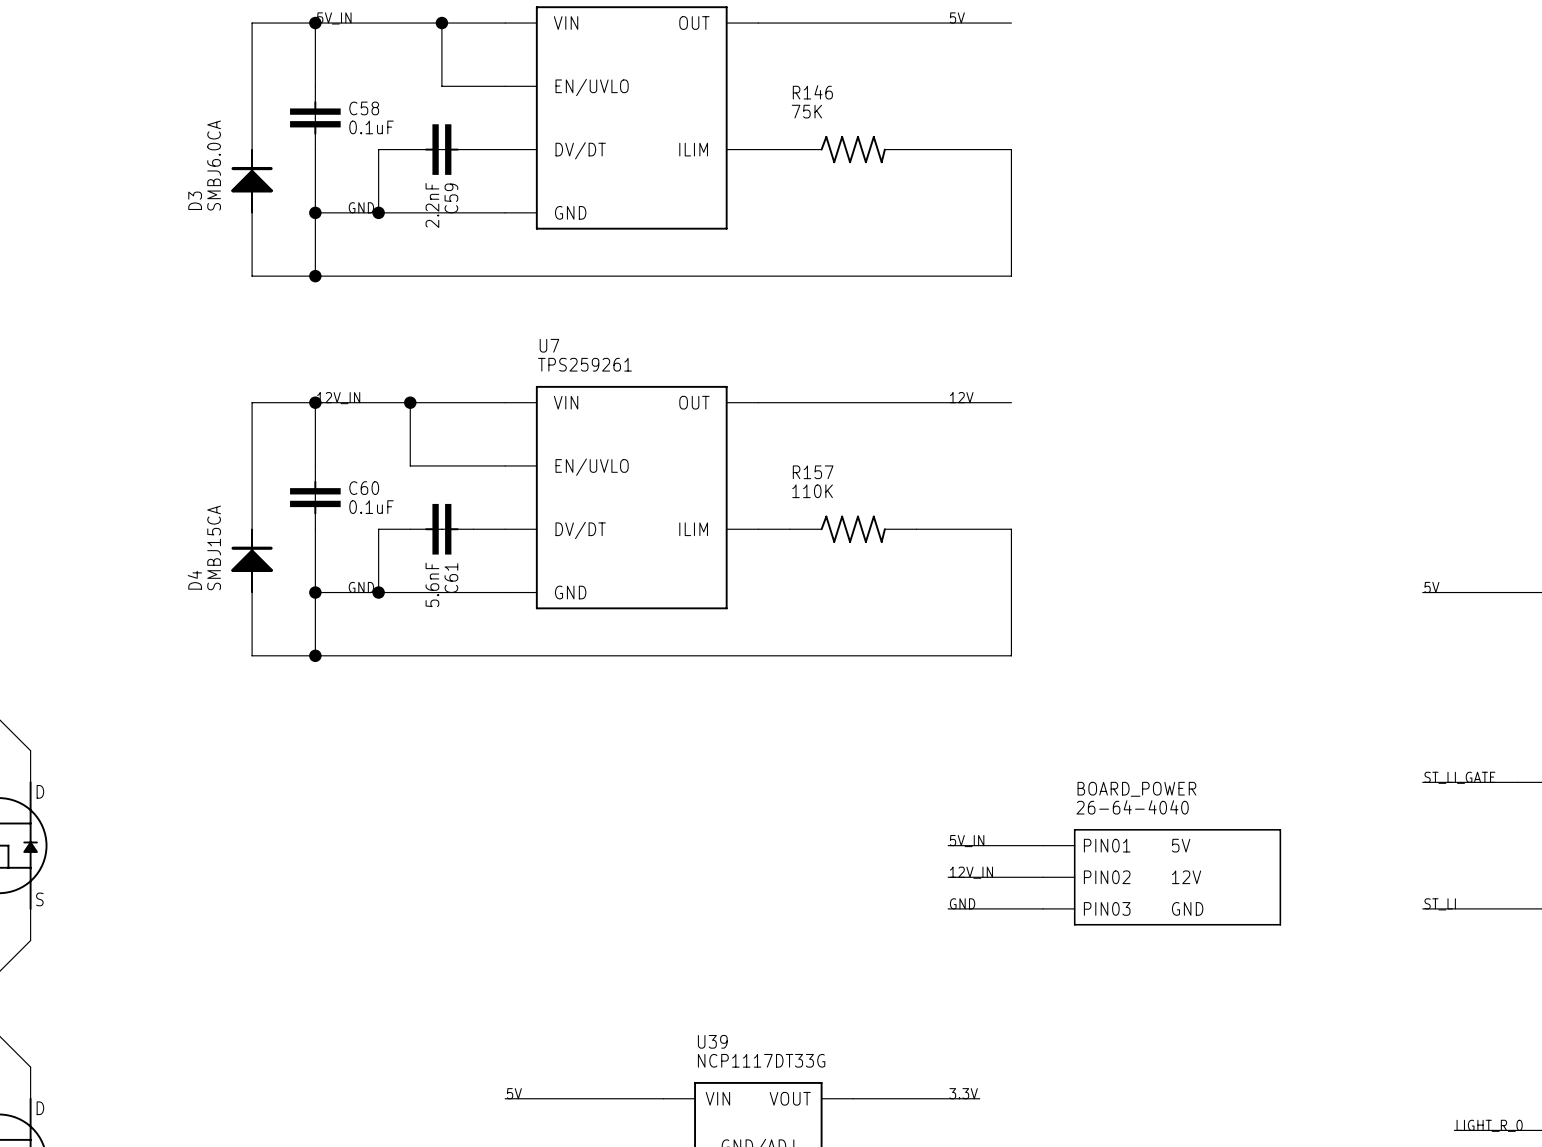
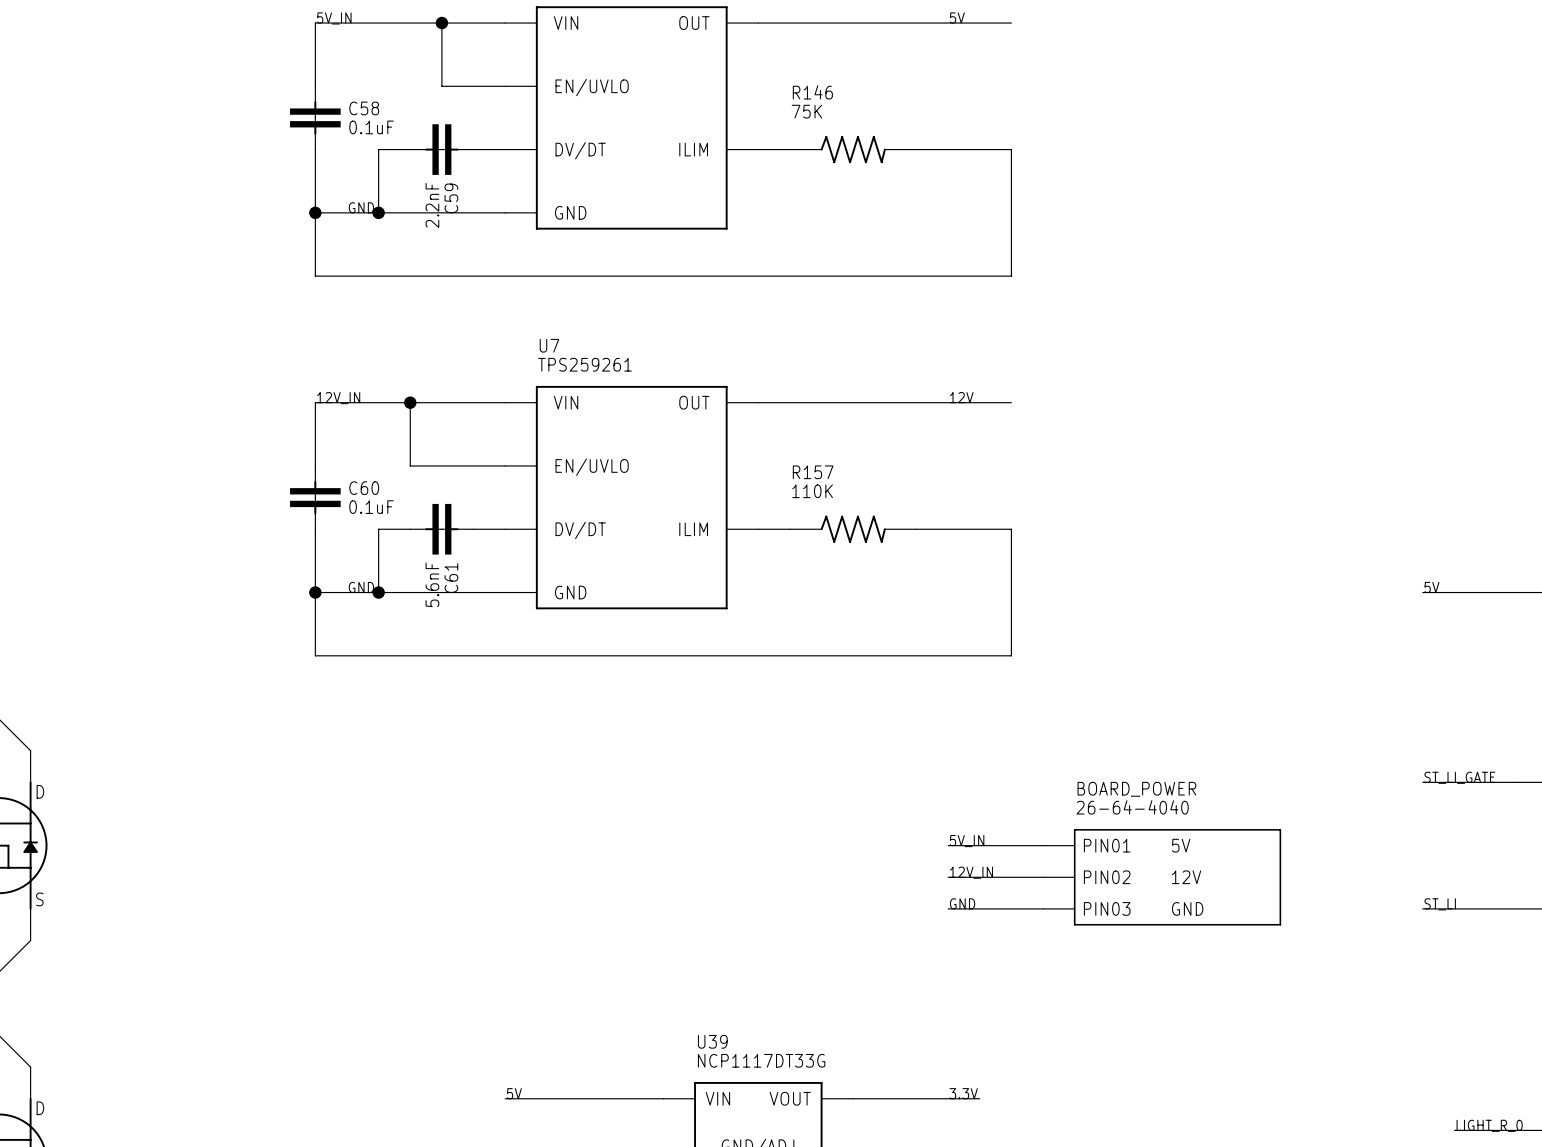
wire: (315, 23) (252, 23) (252, 149) -> none
junction: (315, 23) -> none
D3: SMBJ6.0CA (252, 181) -> none
wire: (252, 212) (252, 276) (315, 276) -> none
junction: (315, 276) -> none
wire: (315, 402) (252, 402) (252, 529) -> none
junction: (315, 402) -> none
D4: SMBJ15CA (252, 560) -> none
wire: (252, 592) (252, 655) (315, 655) -> none
junction: (315, 655) -> none

